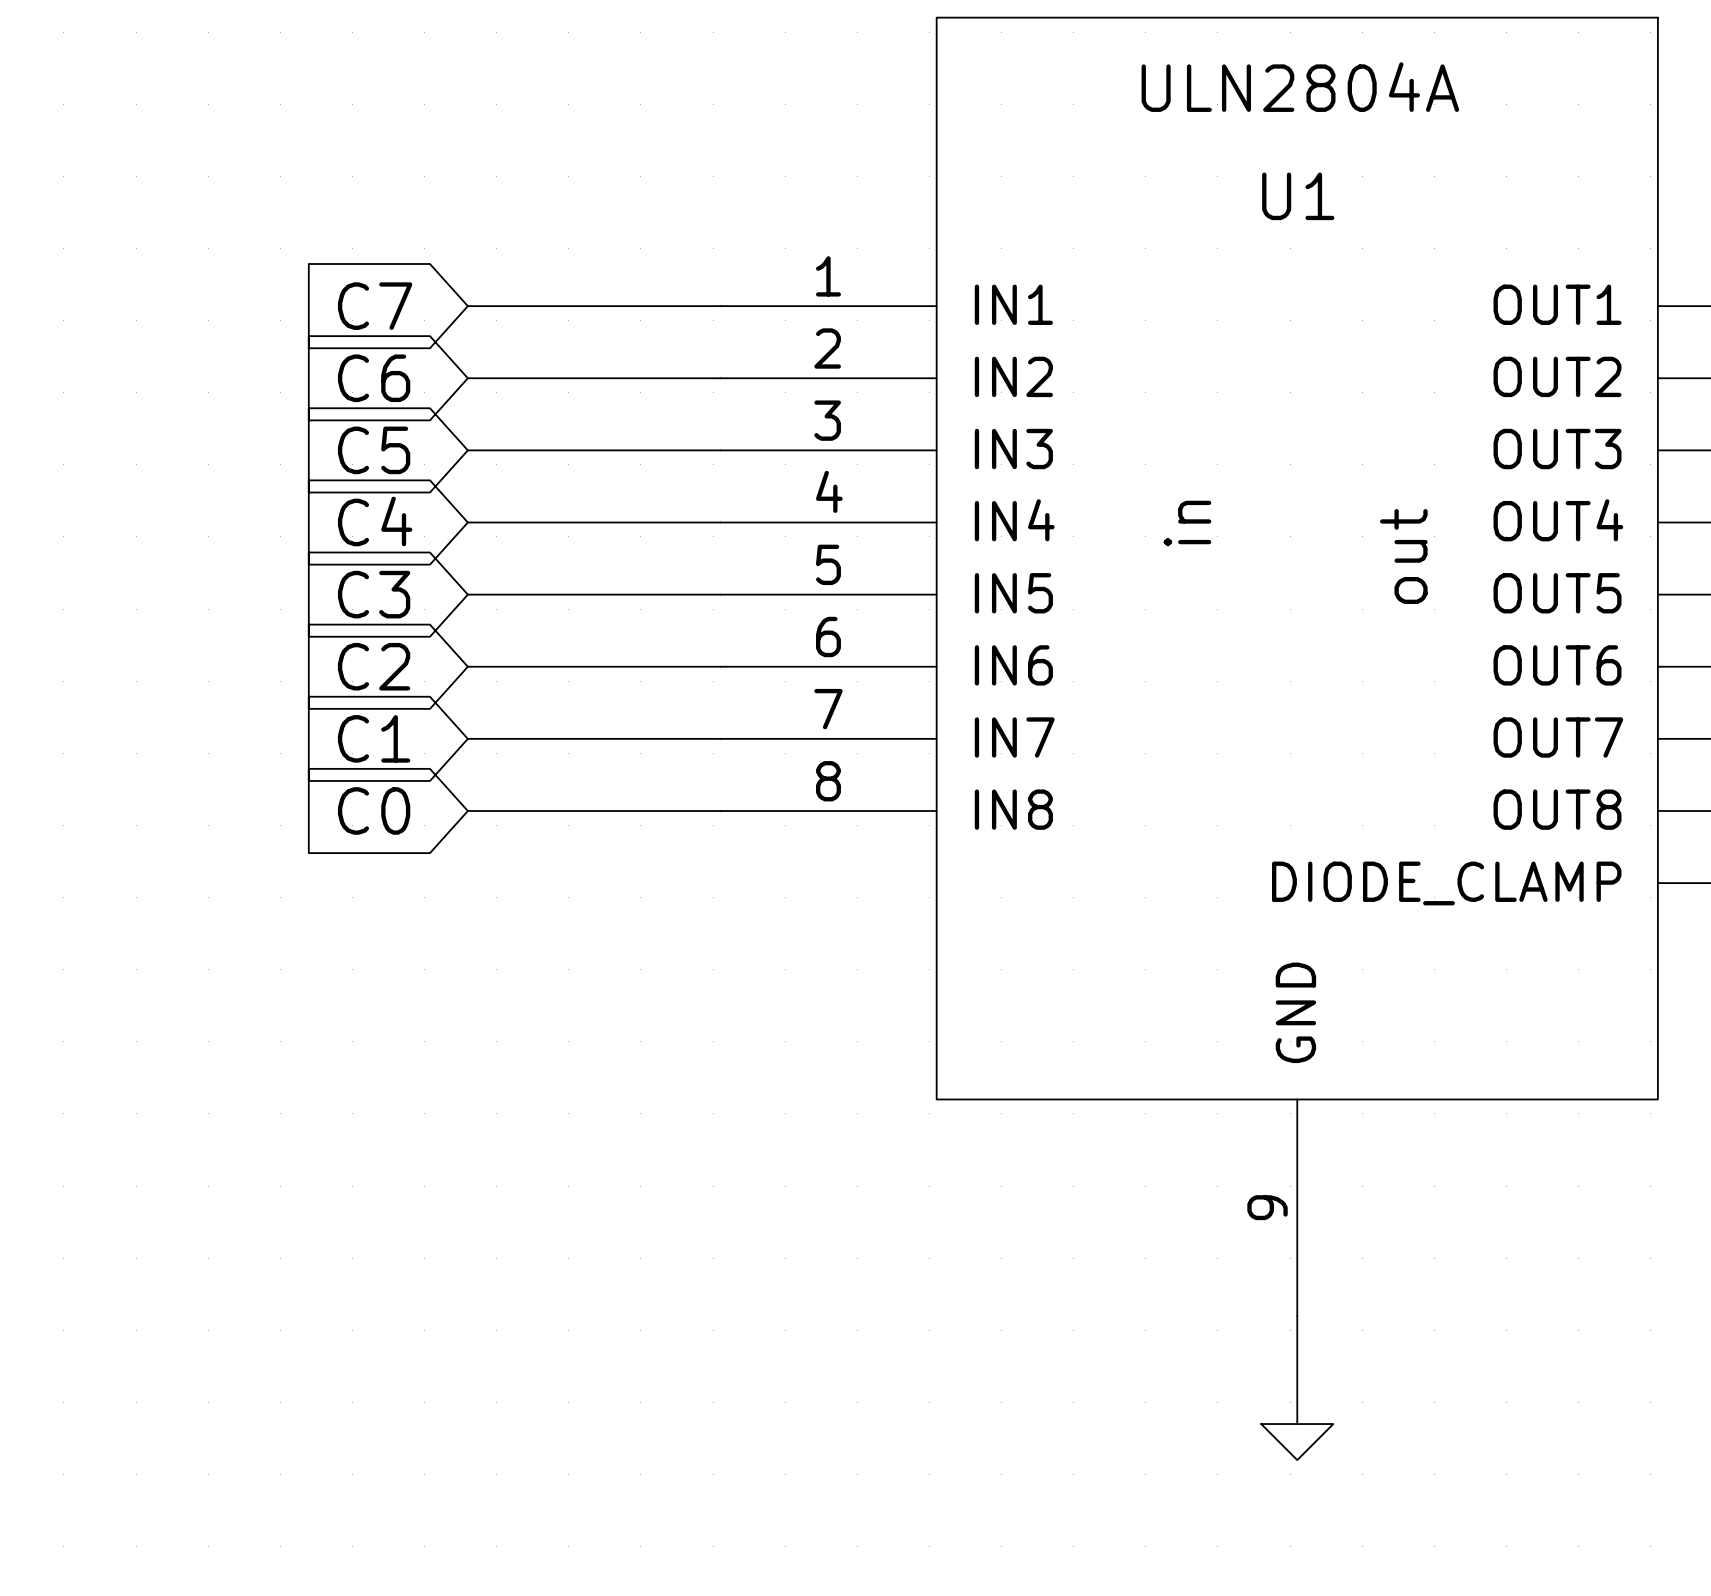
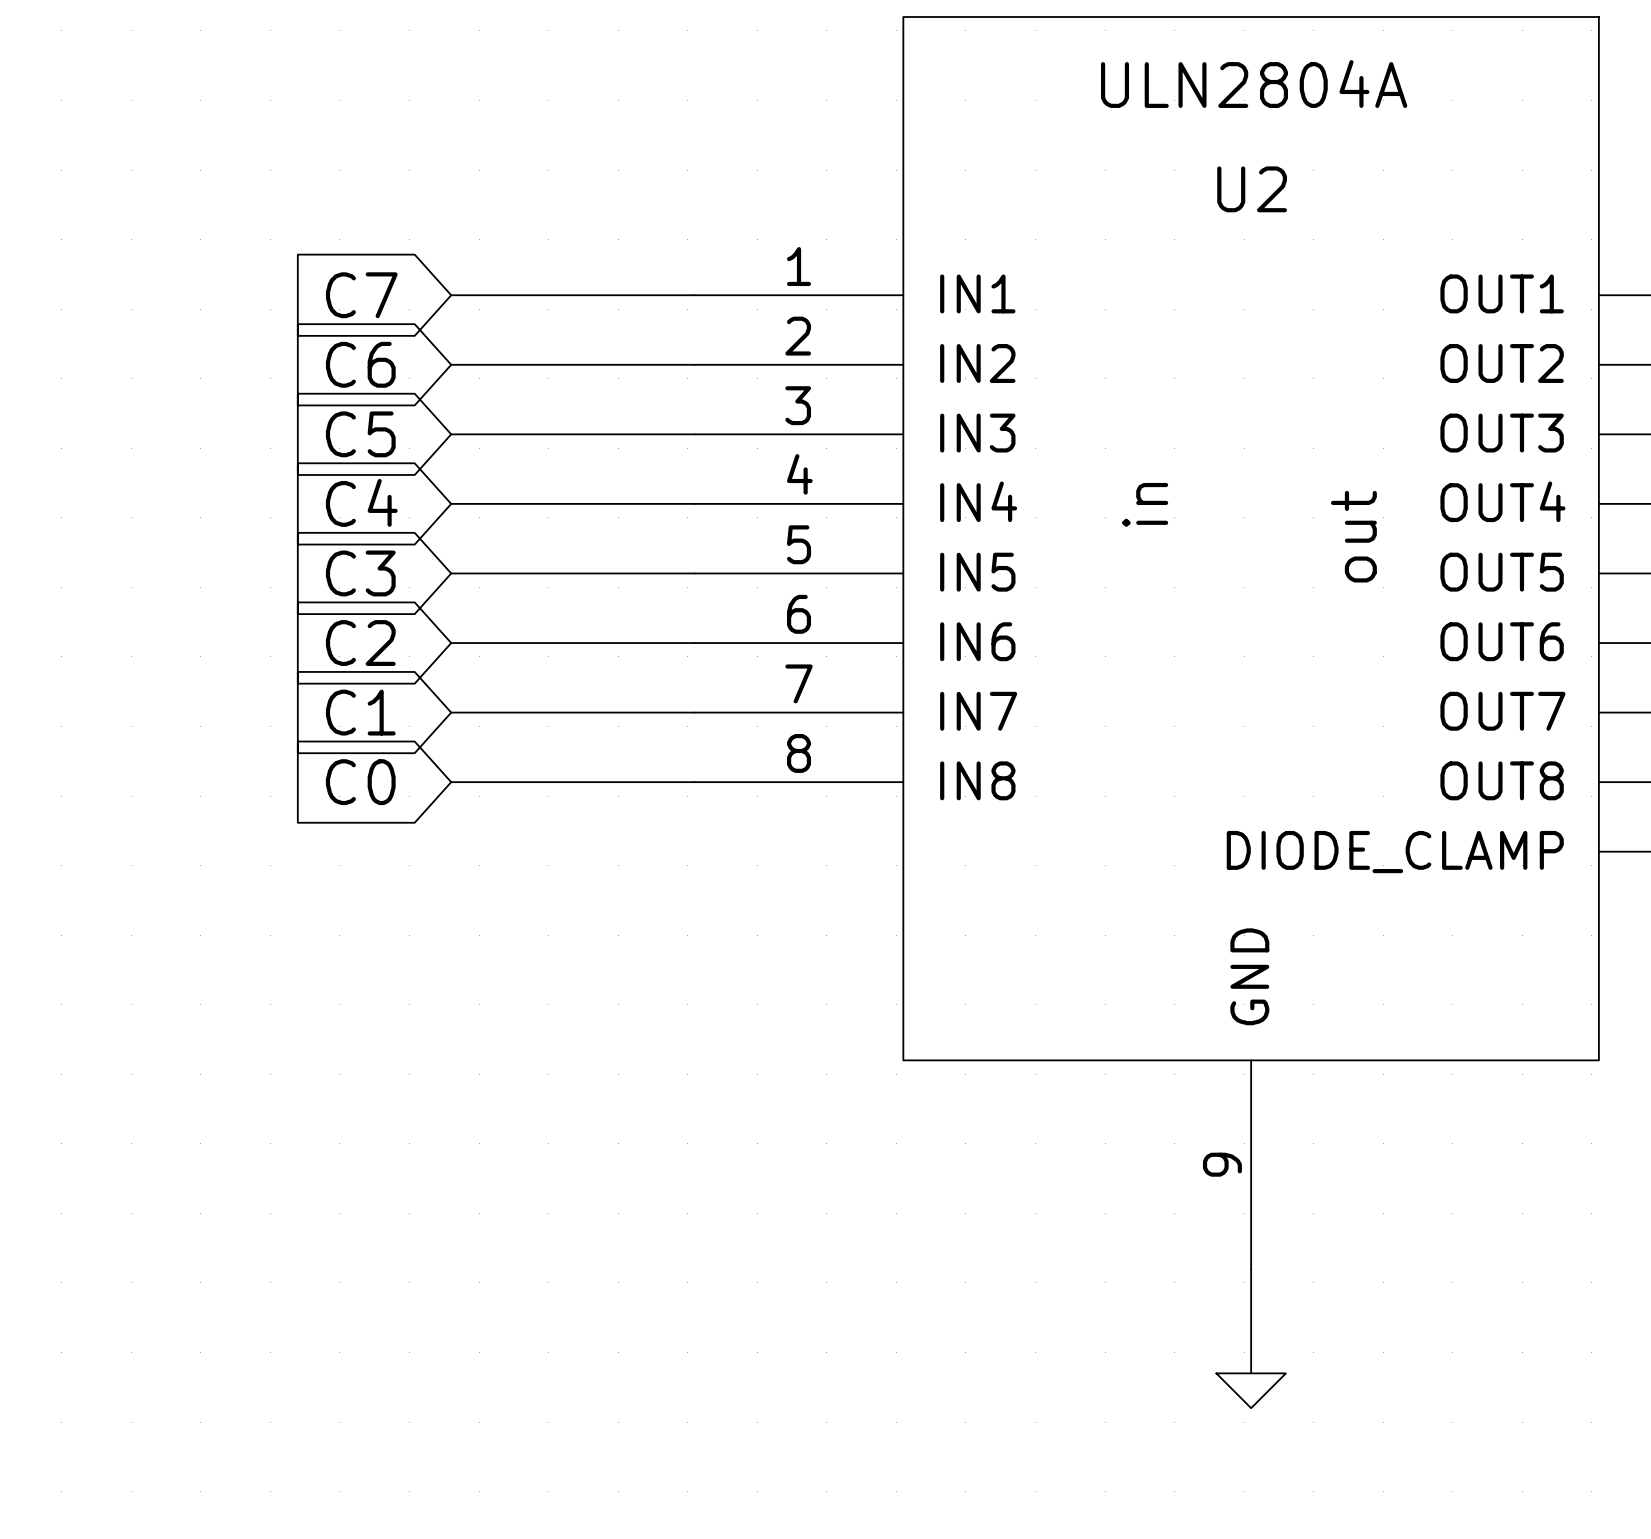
U1 name: U1 (1298, 196) -> U2 (1252, 189)

